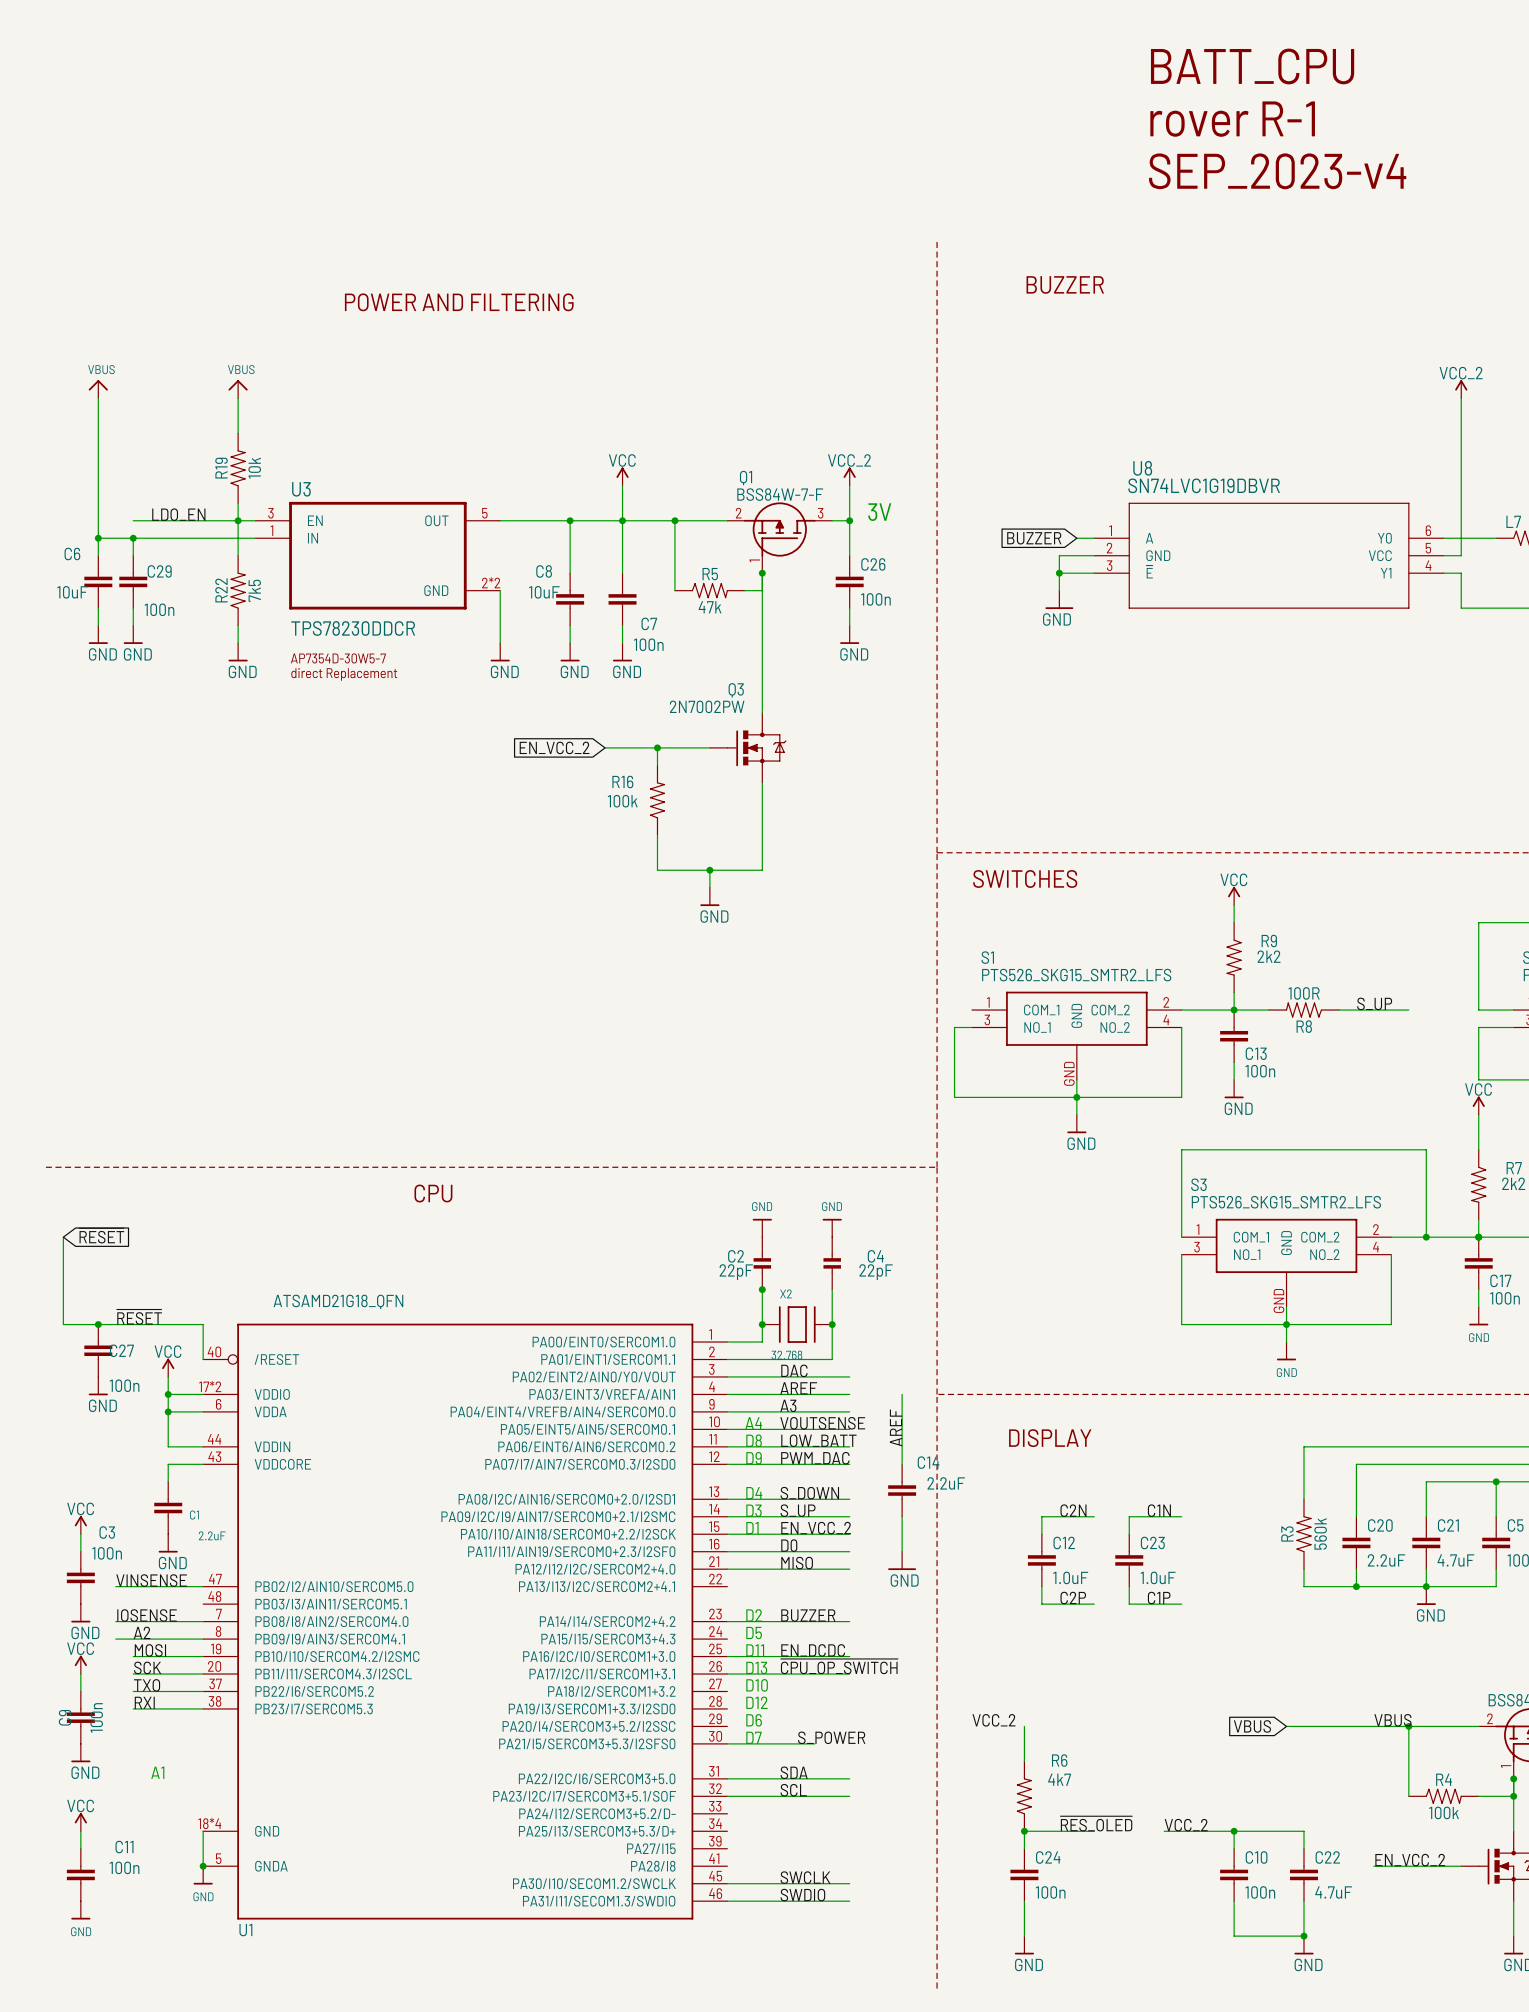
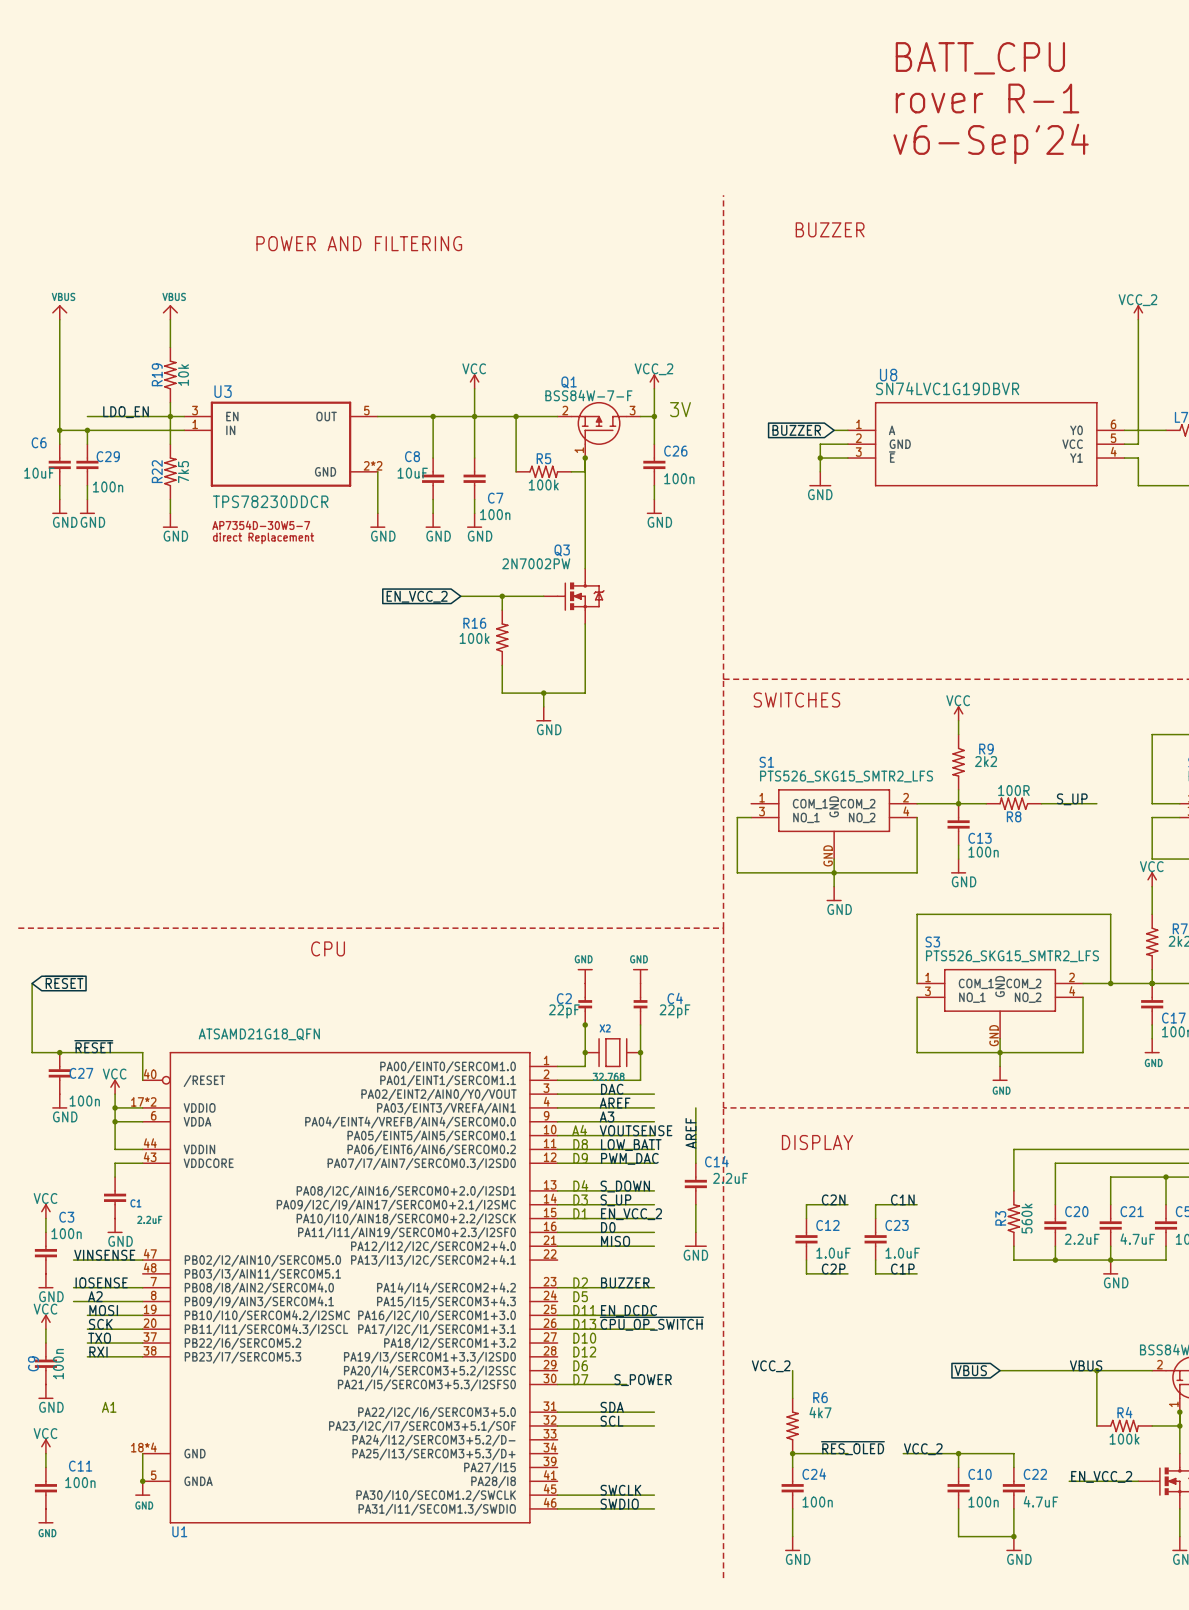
text: SEP_2023-v4 (1277, 171) -> v6-Sep'24 (991, 143)
R5 value: 47k (710, 607) -> 100k (543, 484)

